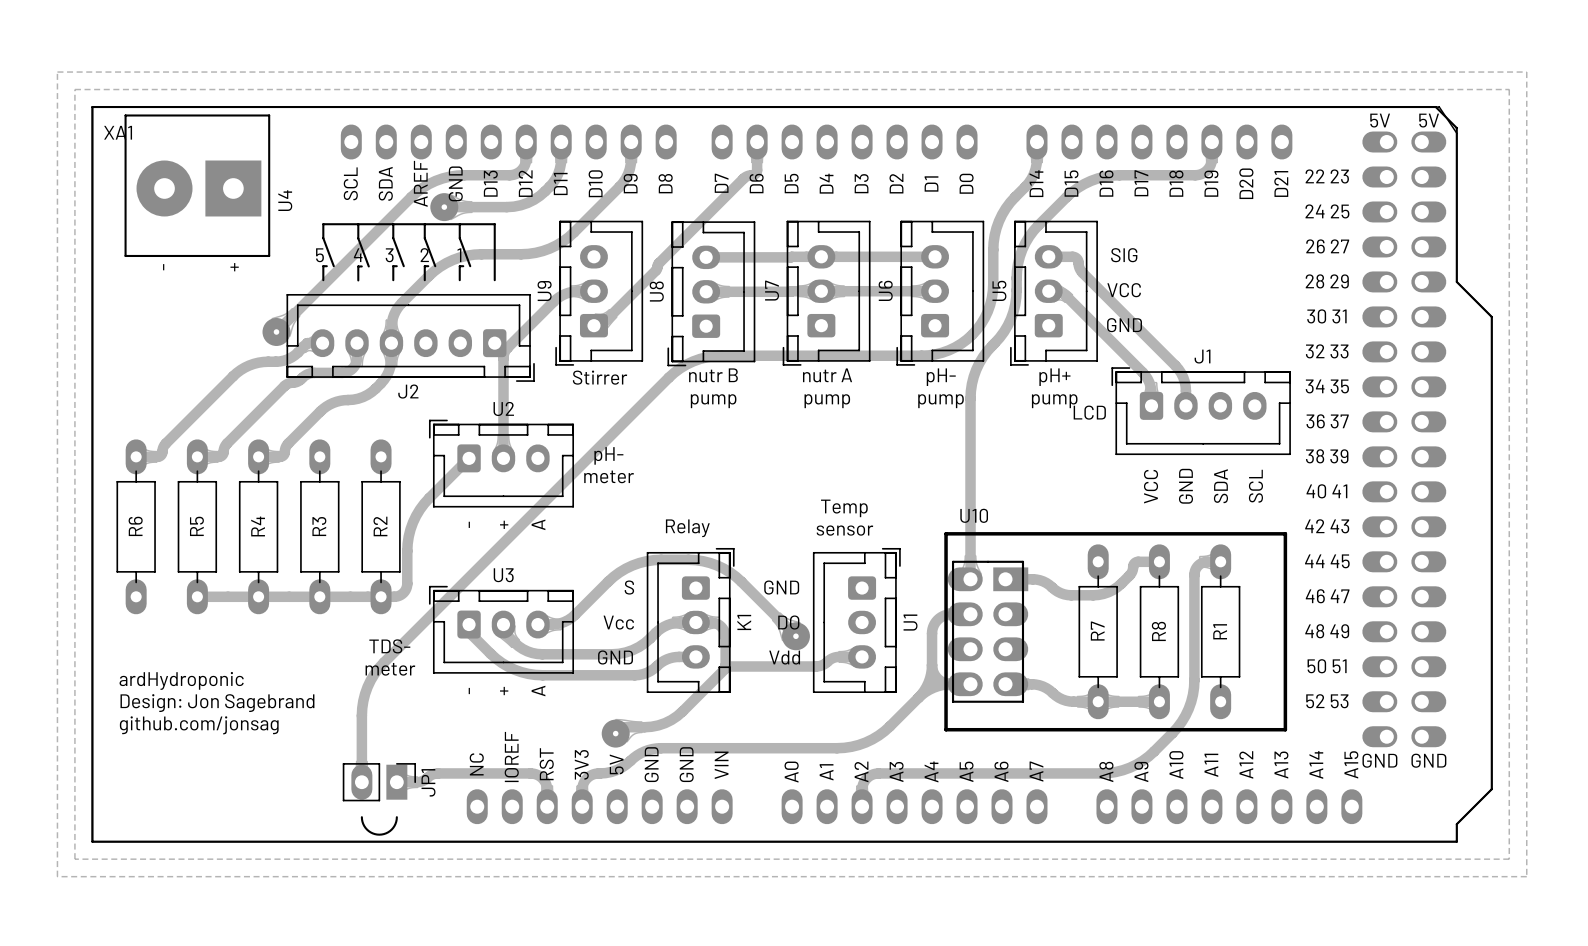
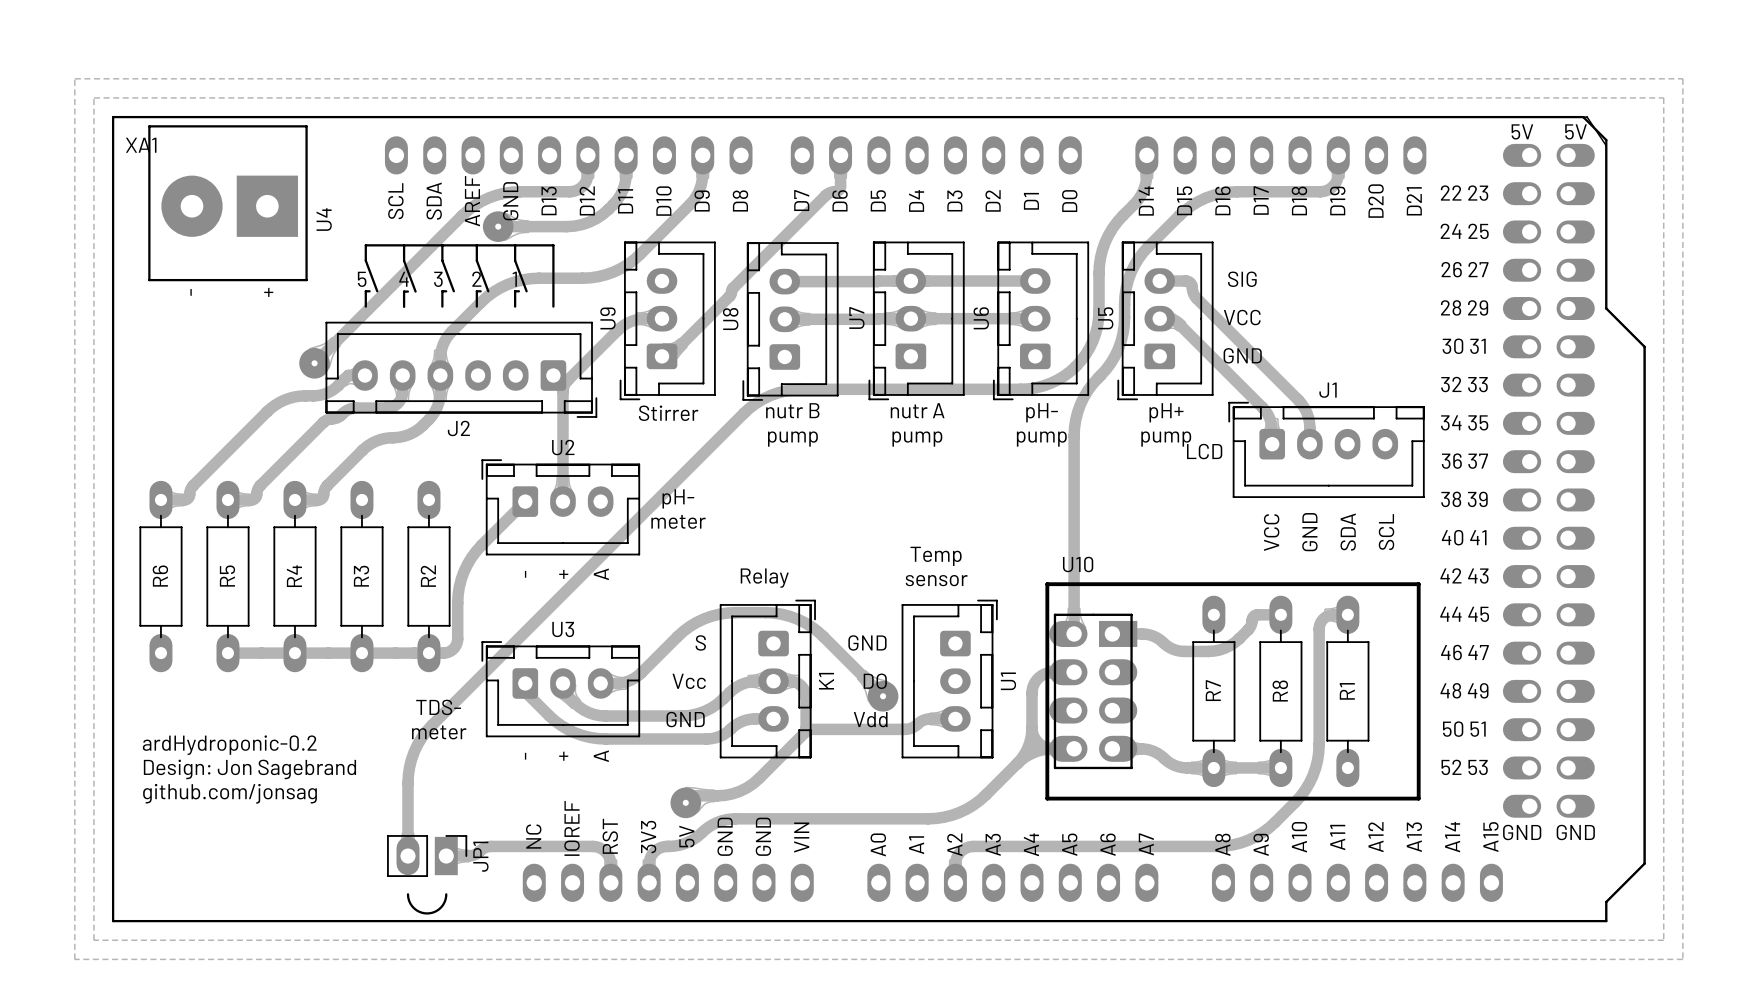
text: ardHydroponic (181, 680) -> ardHydroponic-0.2 (229, 745)

